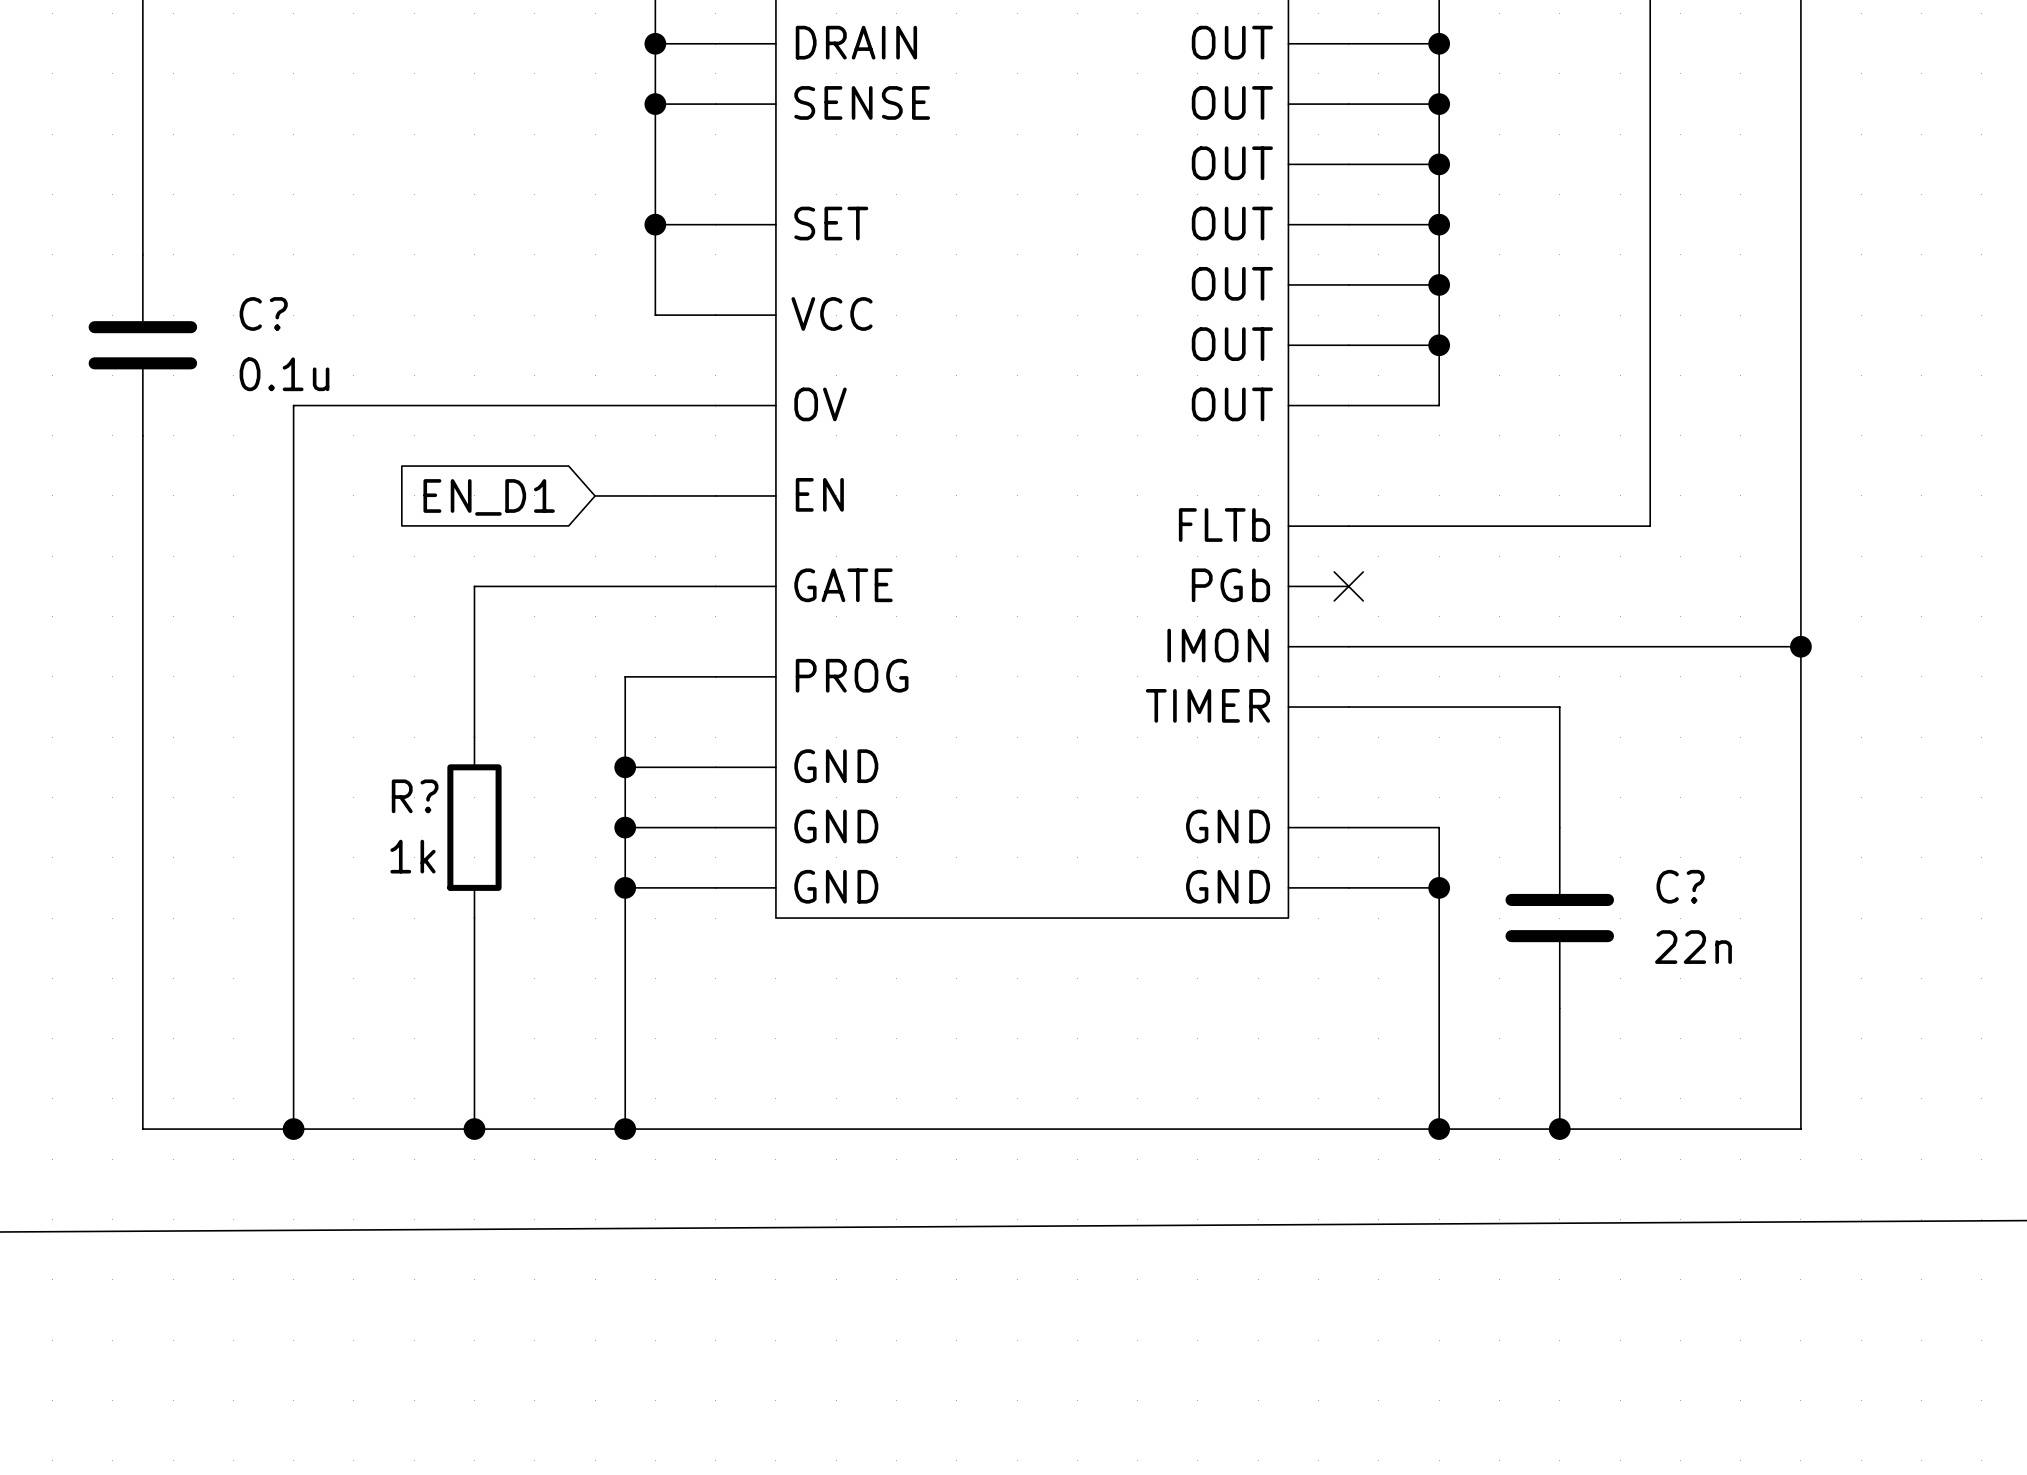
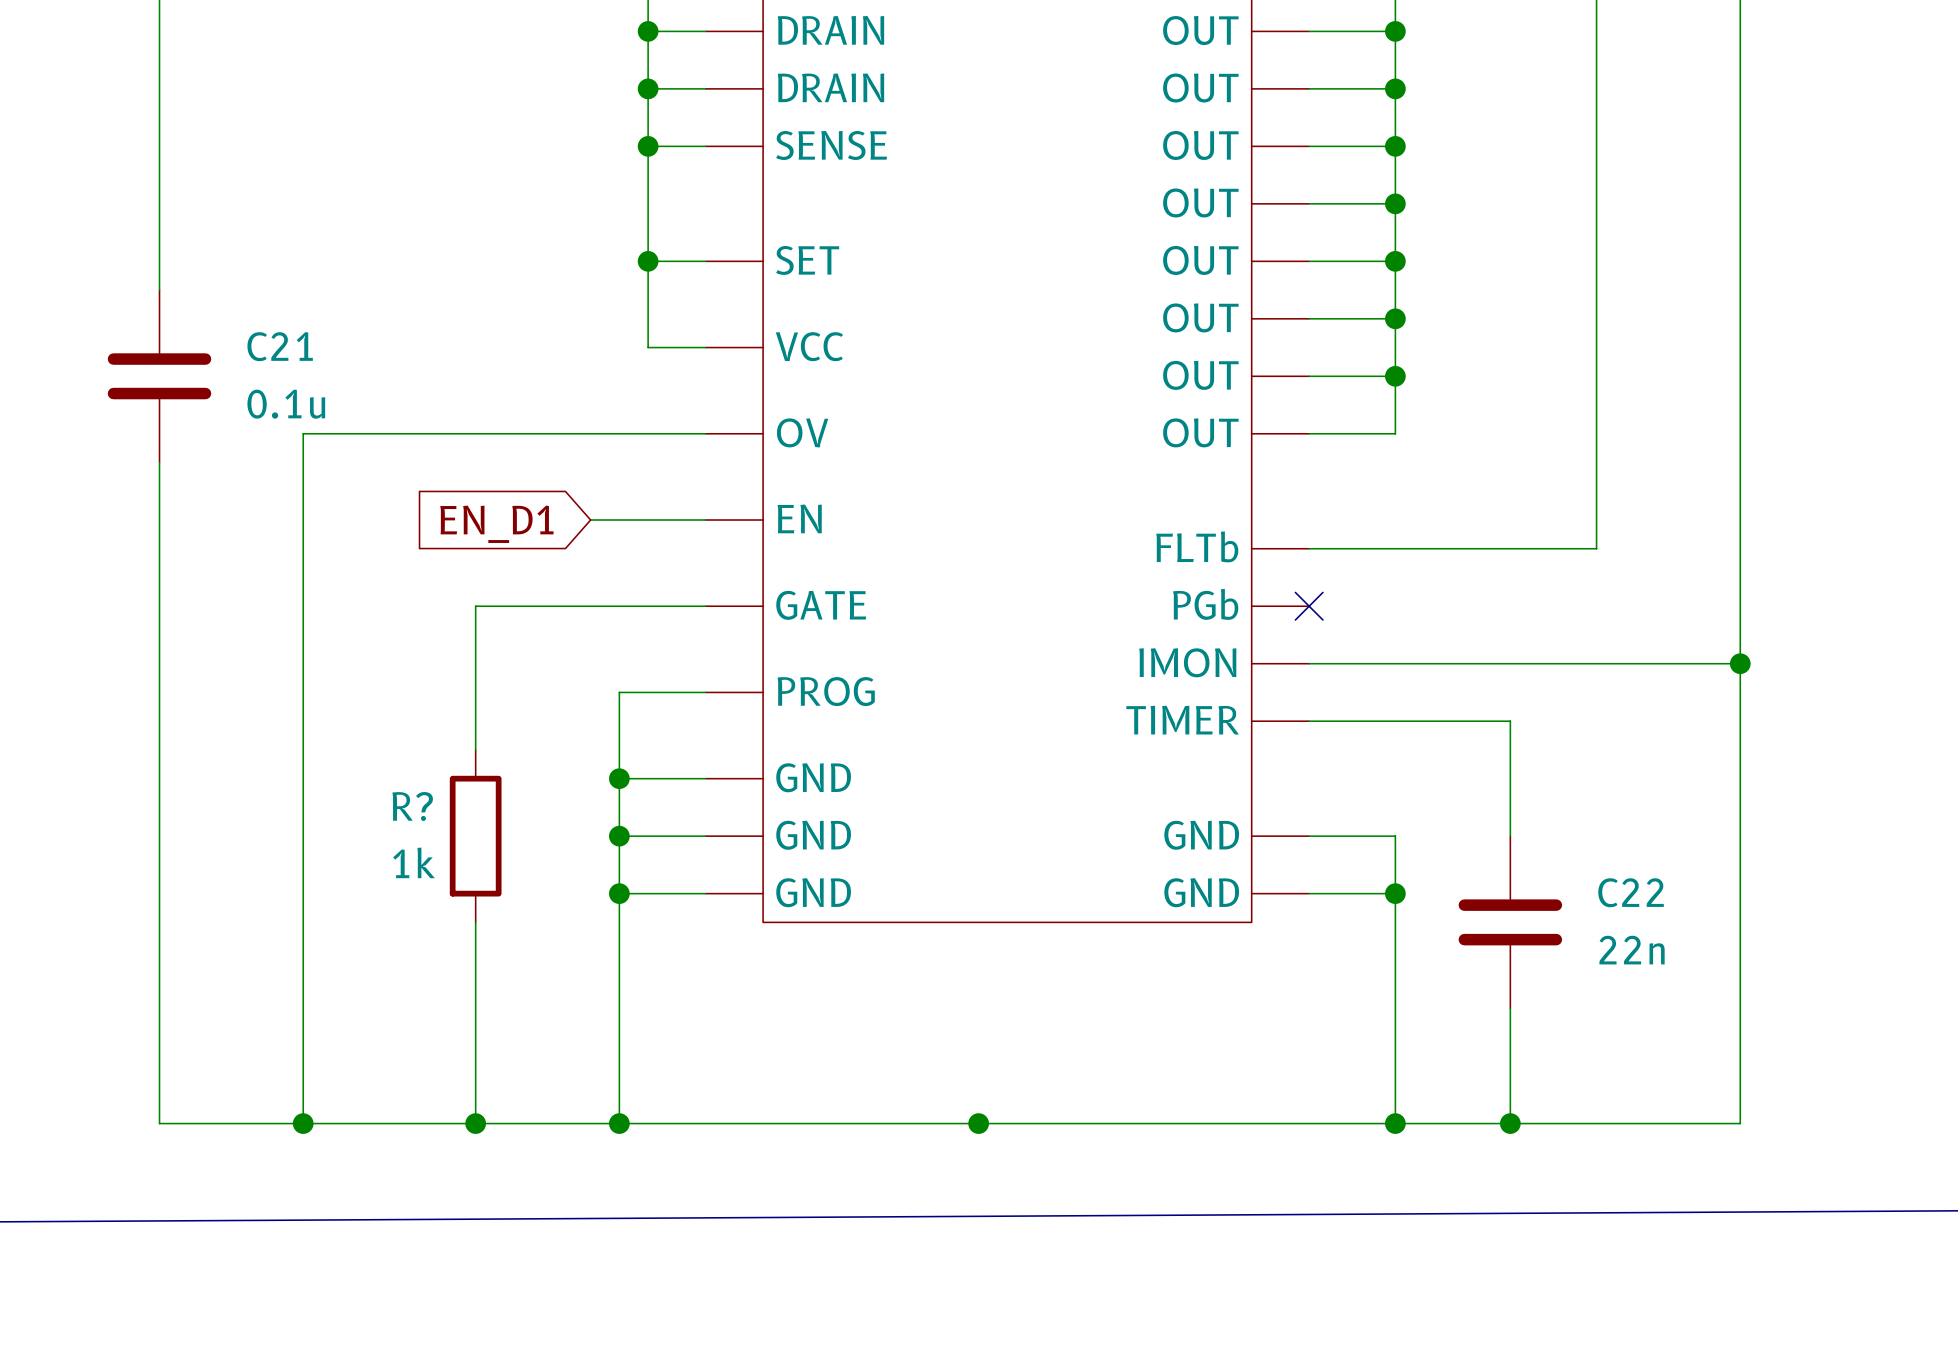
C? name: C? (263, 313) -> C21 (280, 346)
C? name: C? (1680, 886) -> C22 (1631, 892)
junction: none -> (978, 1123)

